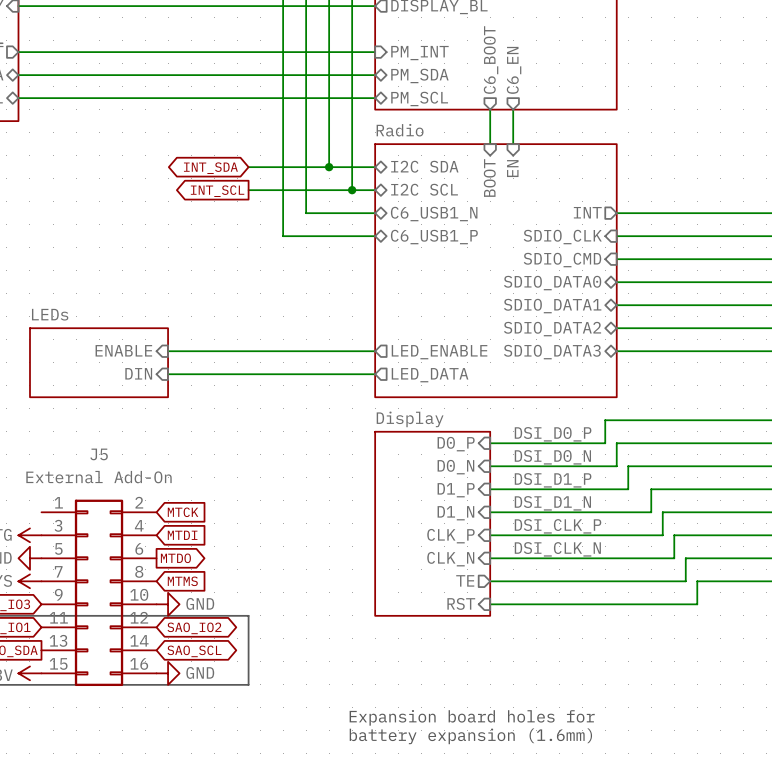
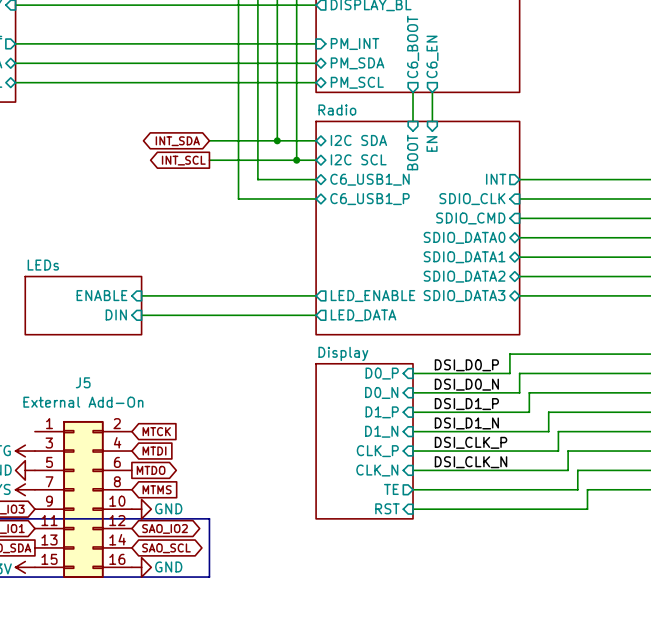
text: Expansion board holes for (472, 717) -> none
text: battery expansion (1.6mm) (470, 736) -> none

